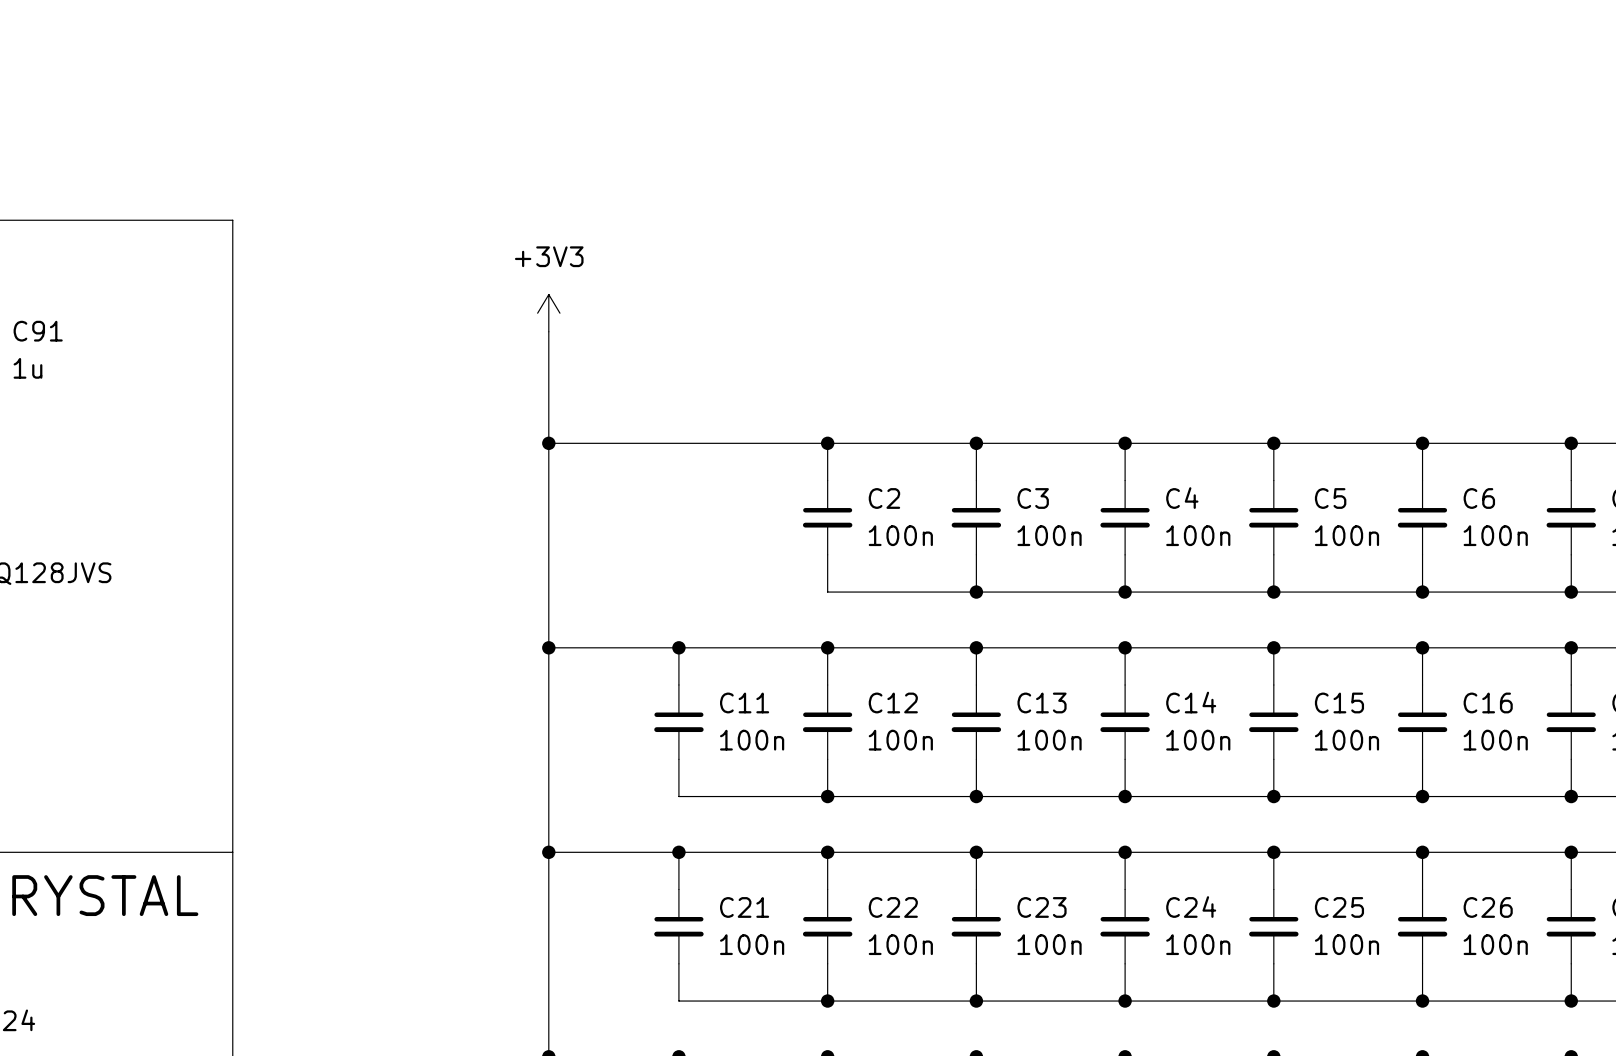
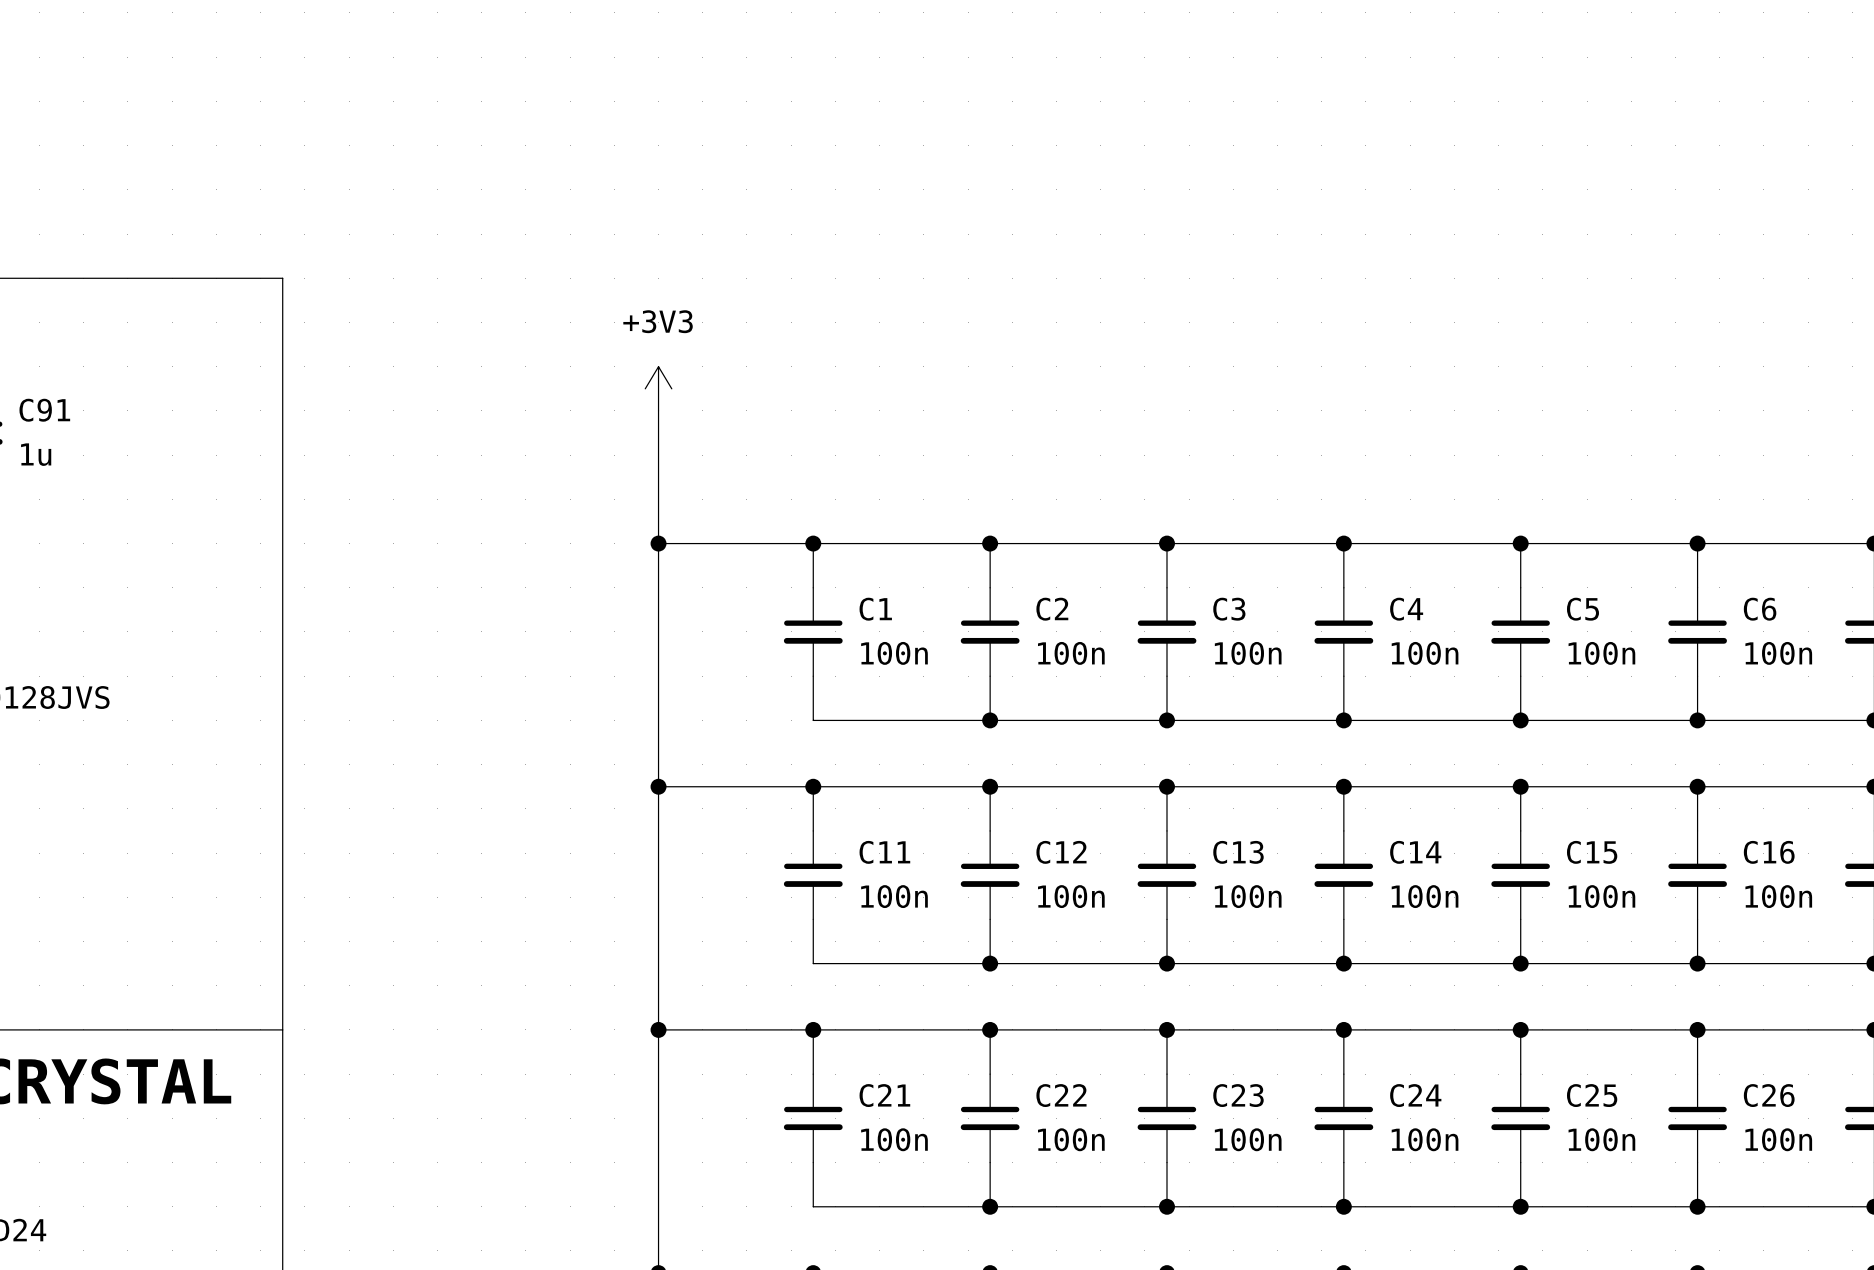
wire: none -> (813, 543) (813, 587)
junction: none -> (813, 543)
C1: none -> 100n (813, 631)
wire: none -> (813, 676) (813, 720) (990, 720)
junction: none -> (990, 720)

